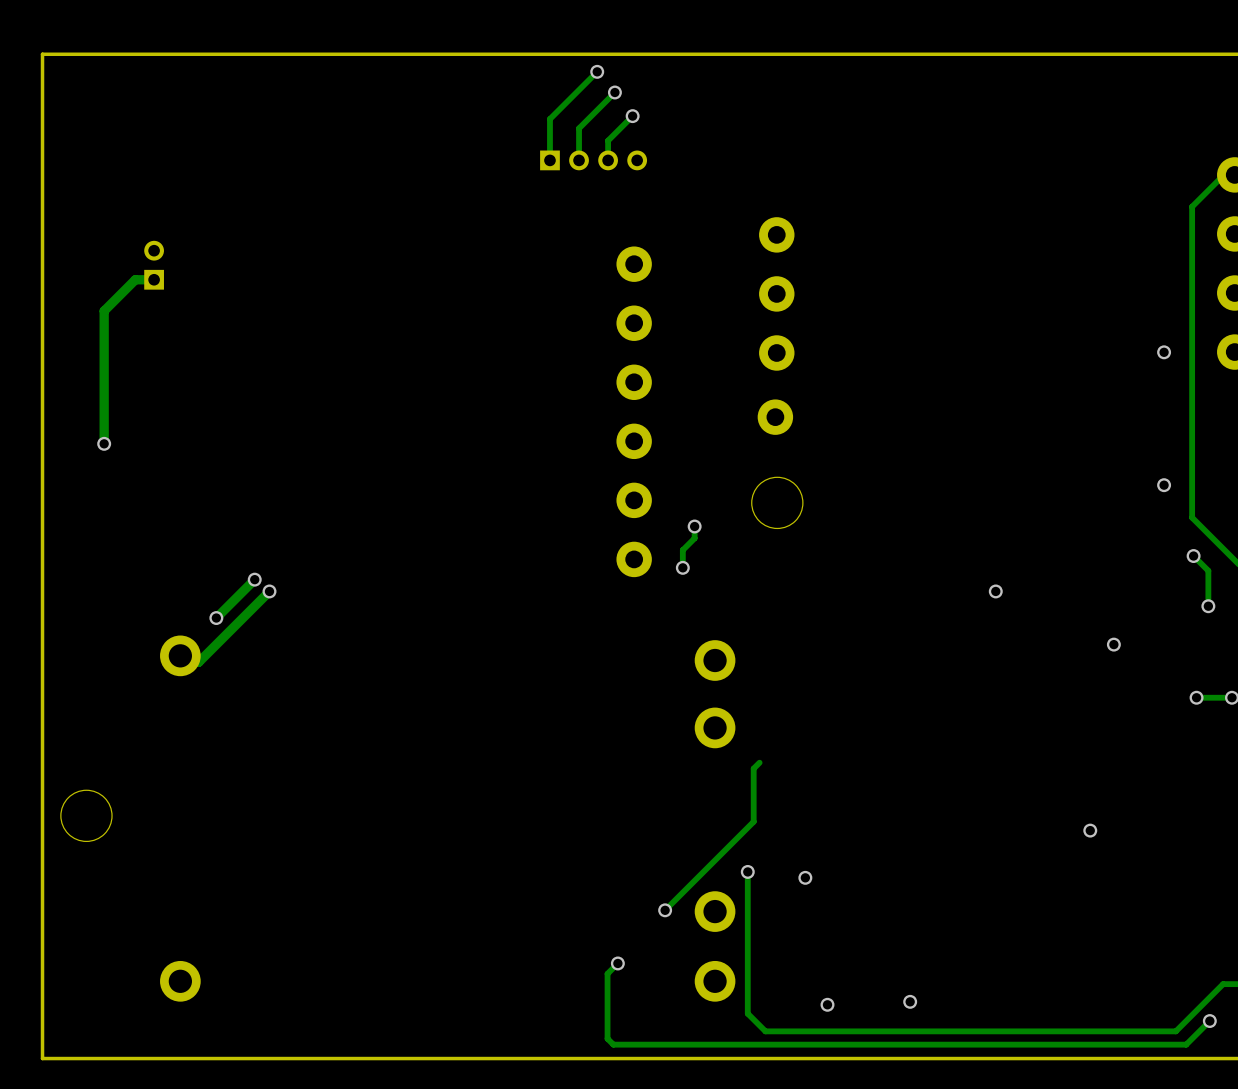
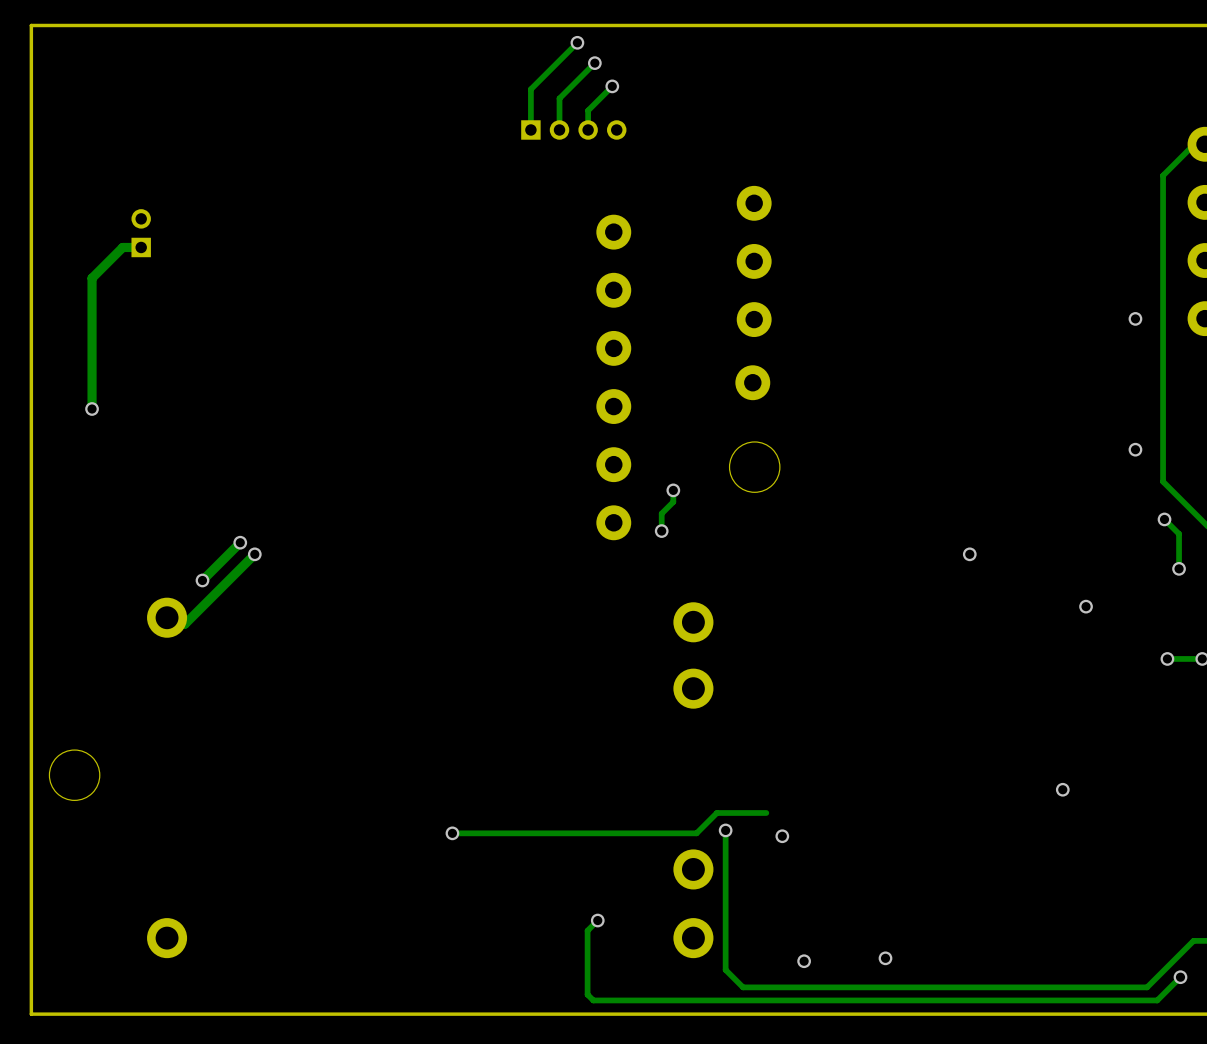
track: (759, 762) (753, 768) (753, 821) (665, 910) -> none
track: none -> (766, 812) (716, 812) (696, 833) (452, 833)
via: none -> (452, 833)
via: (665, 910) -> none

